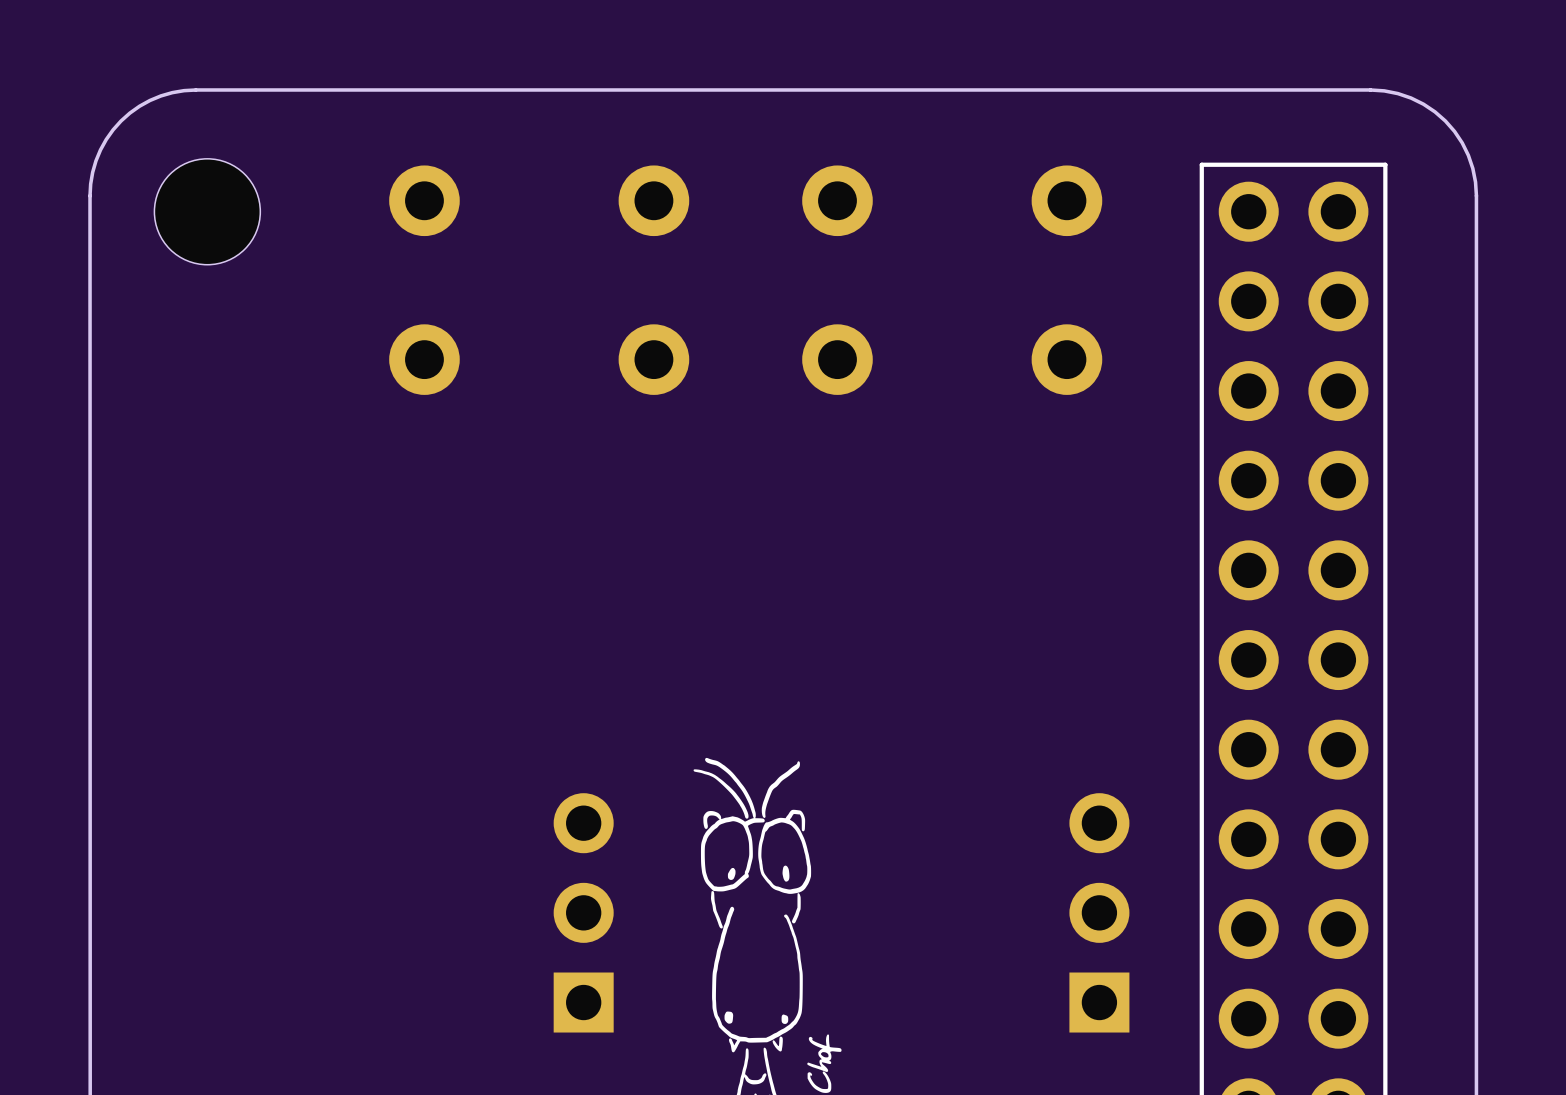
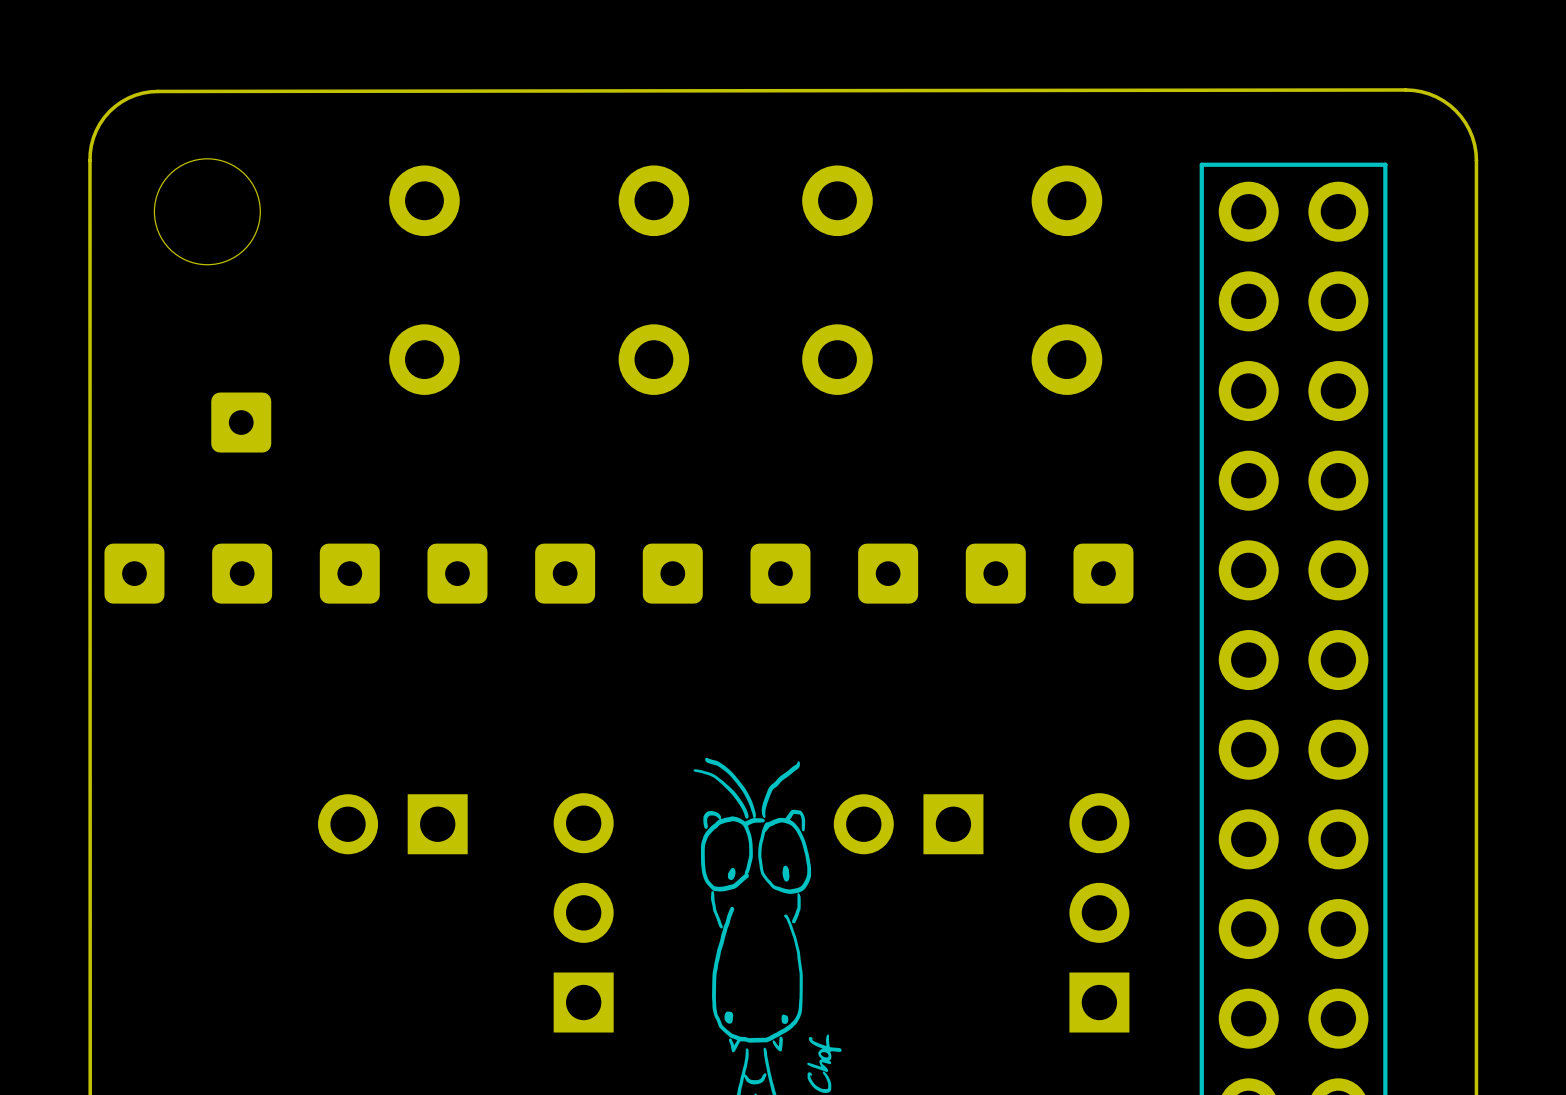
board edge: (1476, 195) (1472, 168) (1468, 155) (1454, 131) (1445, 121) (1423, 104) (1411, 98) (1384, 90) (195, 89) (160, 95) (139, 106) (121, 121) (106, 139) (95, 160) (90, 195) -> (1476, 195) (1475, 152) (1472, 137) (1465, 123) (1455, 110) (1443, 100) (1429, 93) (1405, 89) (157, 91) (142, 93) (128, 98) (109, 111) (99, 123) (93, 137) (89, 160)
part: none -> (241, 422)
part: none -> (134, 573)
part: none -> (242, 573)
part: none -> (349, 573)
part: none -> (457, 573)
part: none -> (565, 573)
part: none -> (672, 573)
part: none -> (780, 573)
part: none -> (888, 573)
part: none -> (995, 573)
part: none -> (1103, 573)
part: none -> (392, 824)
part: none -> (908, 824)

